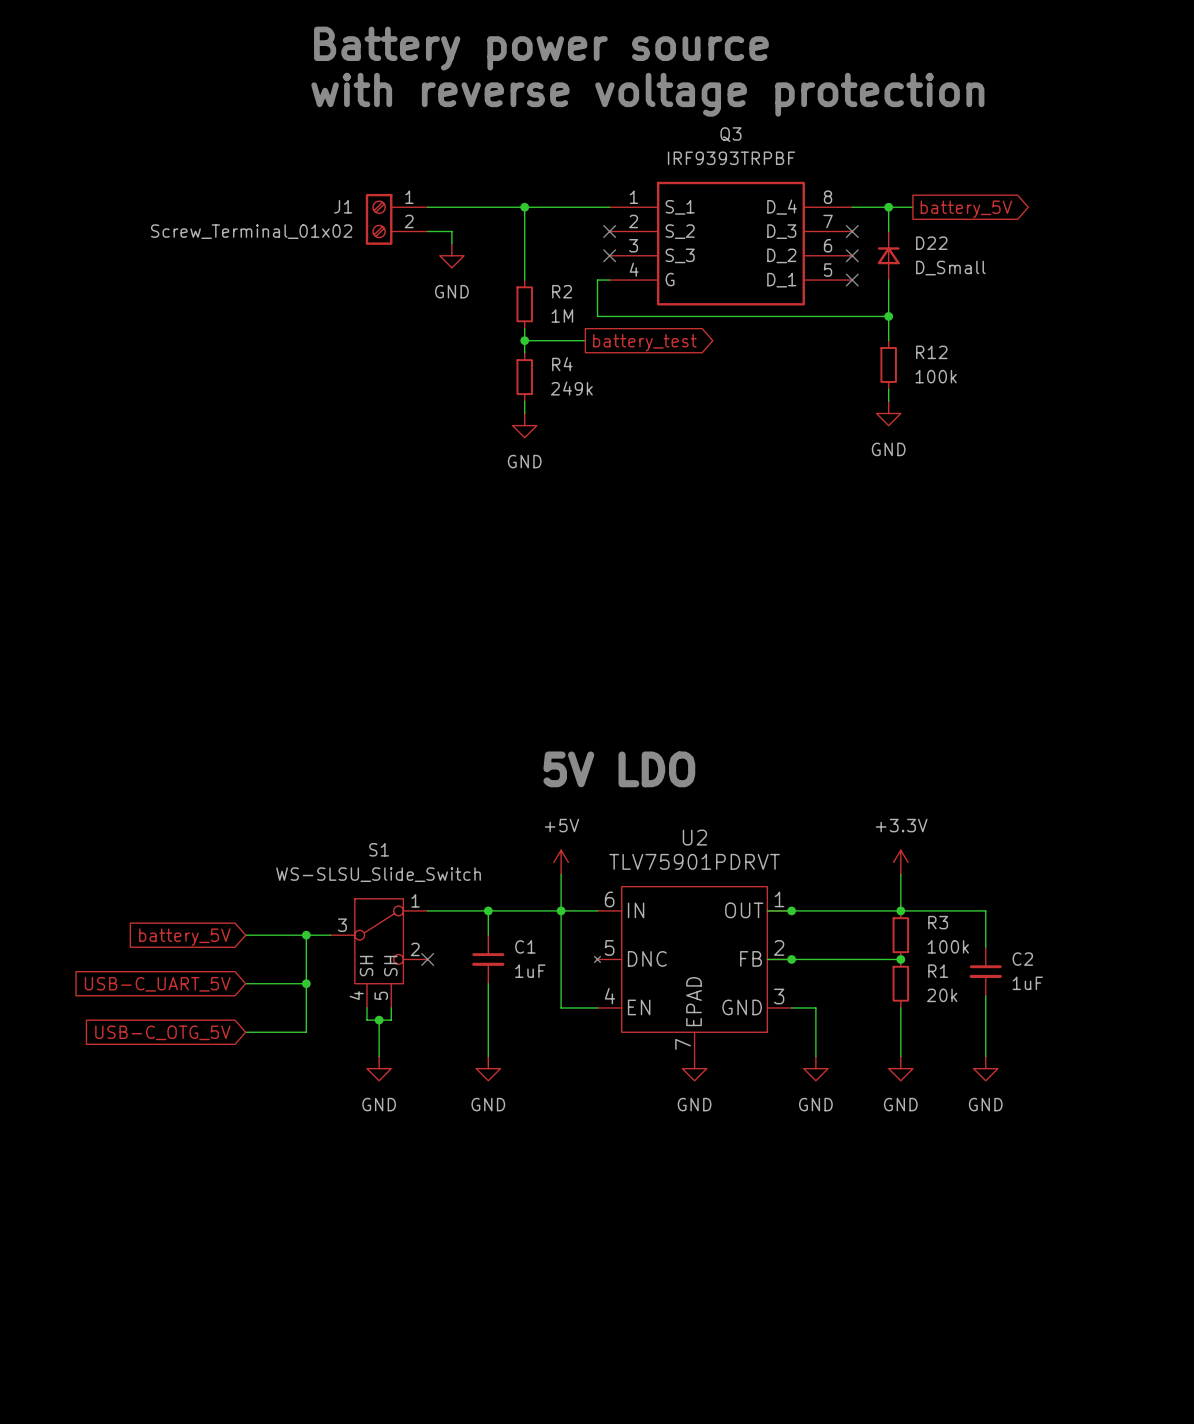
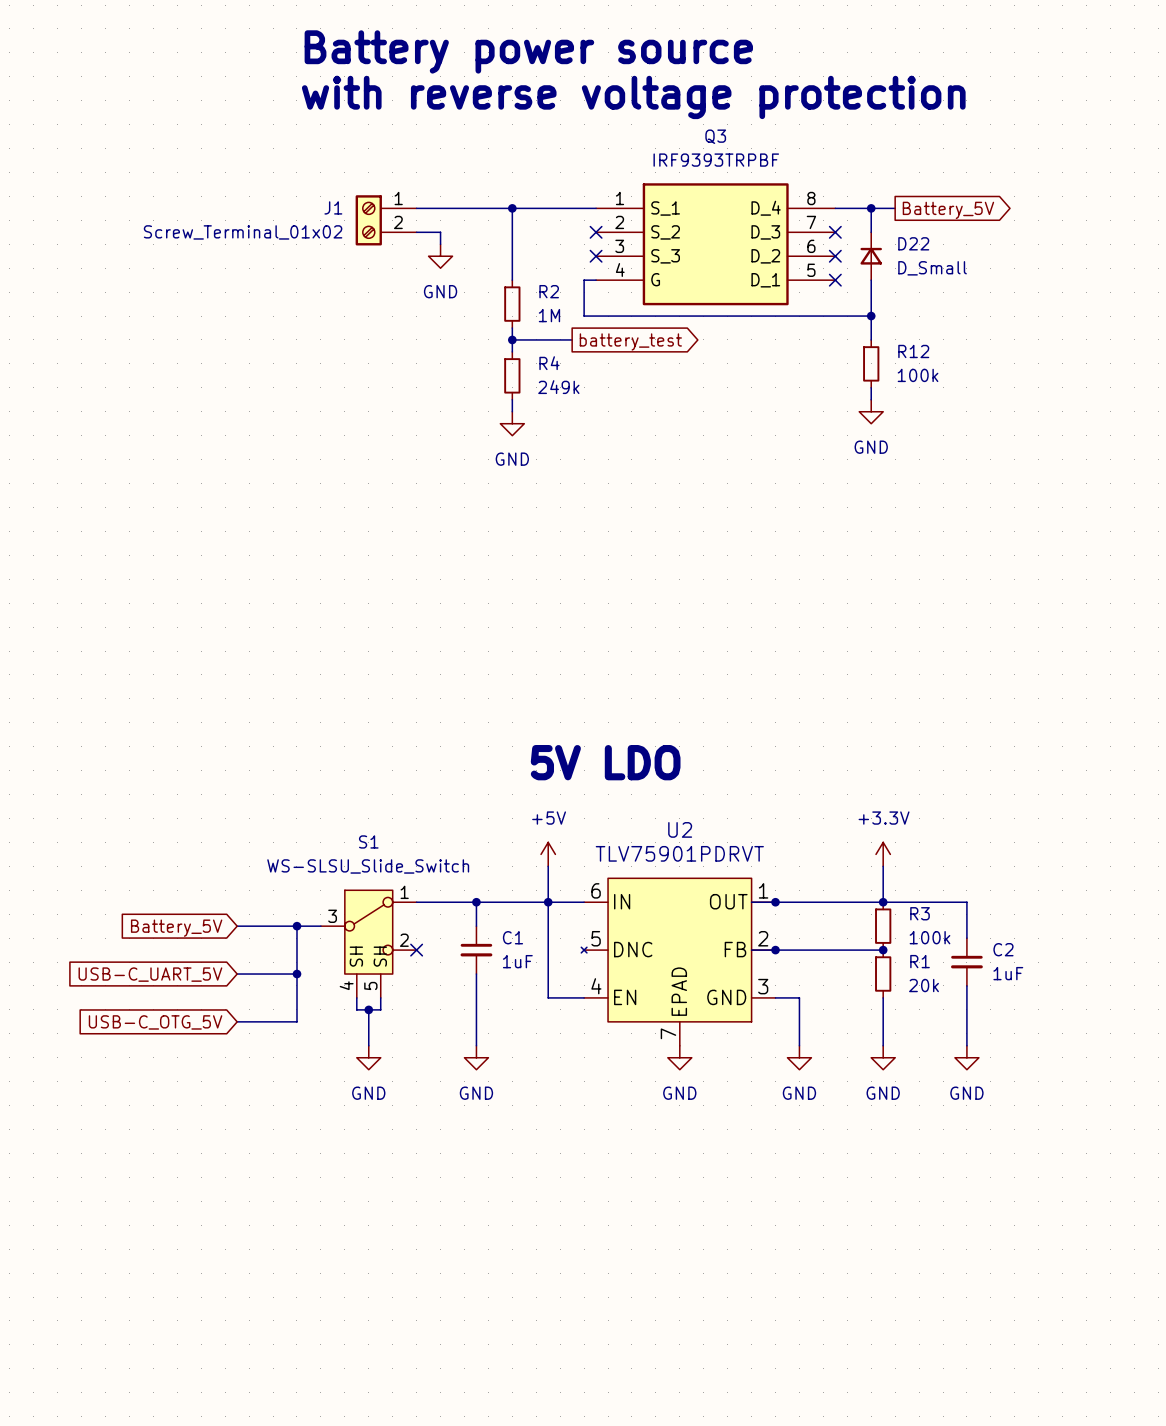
global label: battery_5V (966, 209) -> Battery_5V (948, 210)
global label: battery_5V (184, 937) -> Battery_5V (176, 928)

